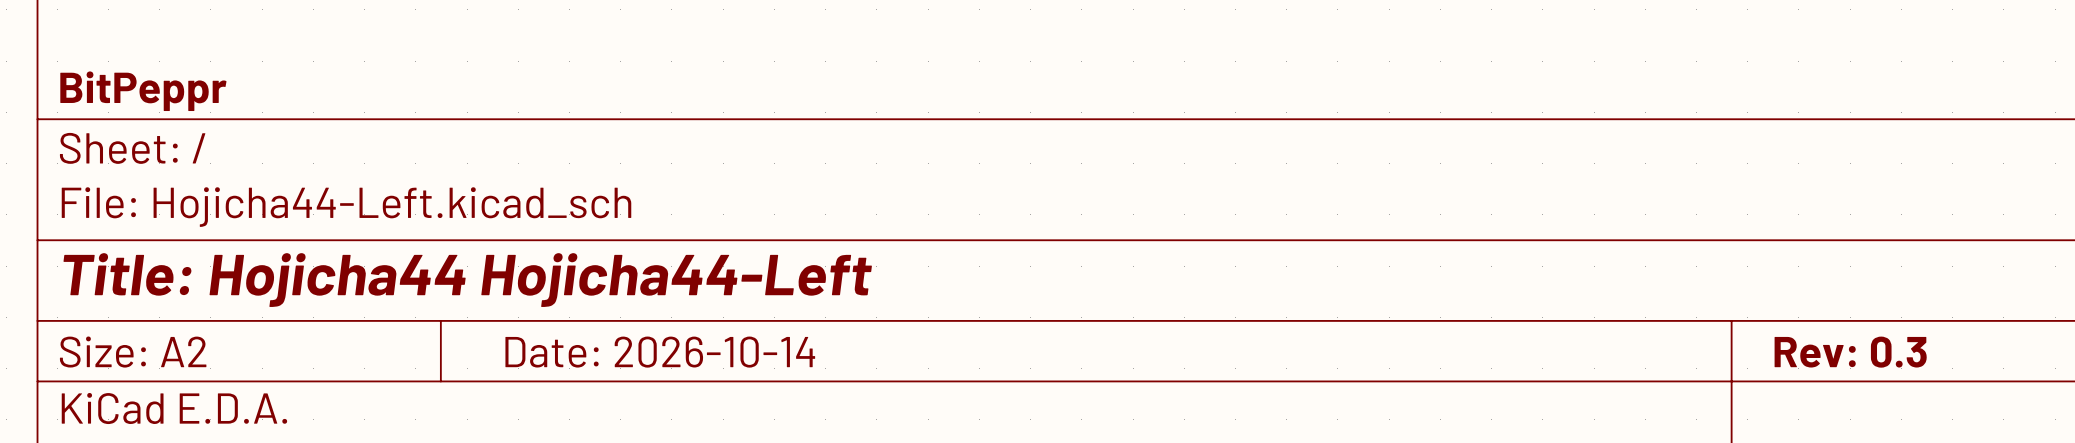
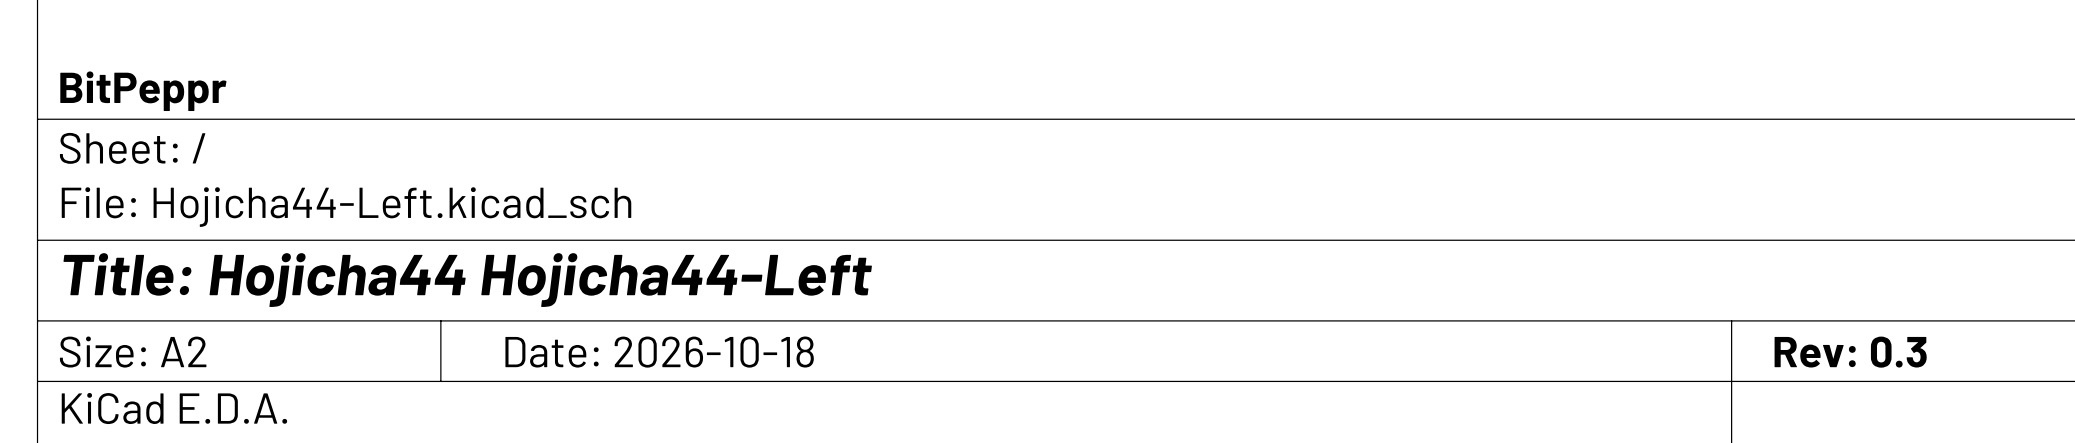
title block: Date: 2026-10-14 (660, 352) -> Date: 2026-10-18 (659, 352)

